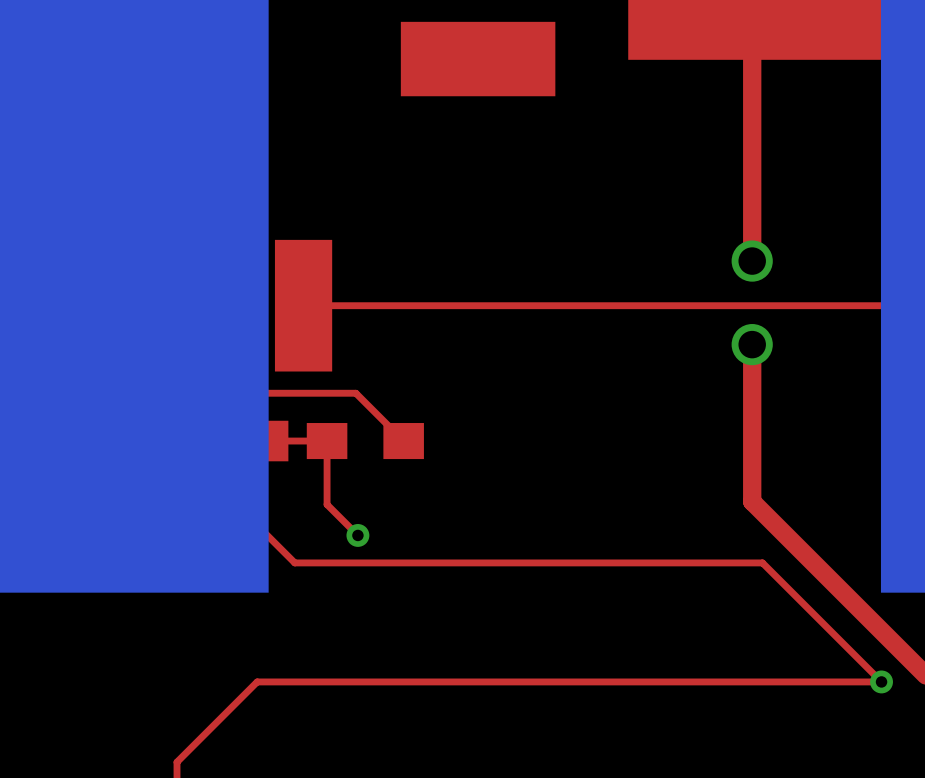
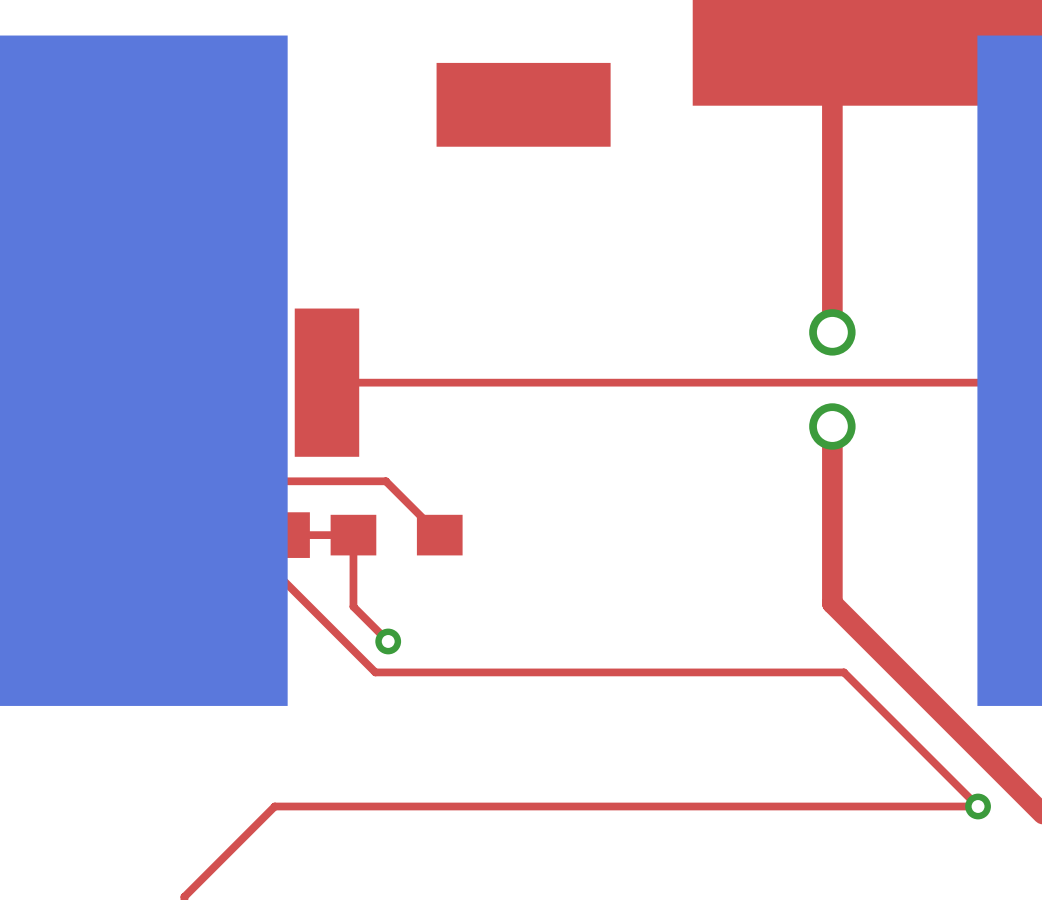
top track: (200, 441) (200, 468) (294, 562) (346, 562) -> (210, 535) (224, 535) (259, 569) (272, 569) (375, 672)

